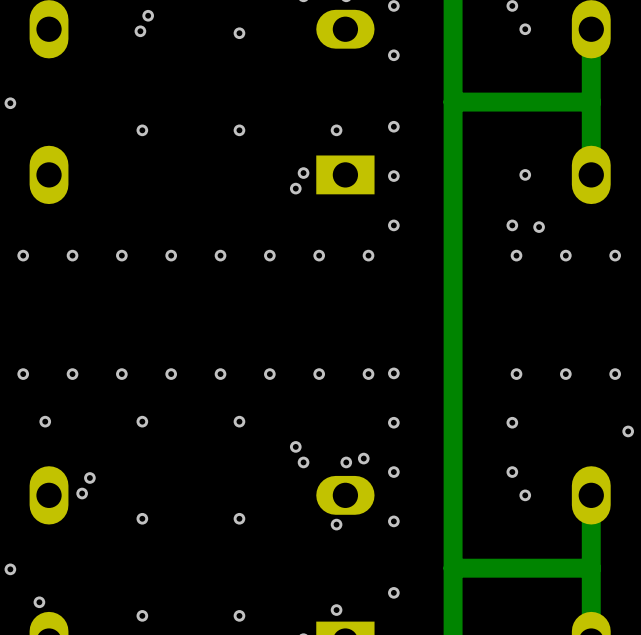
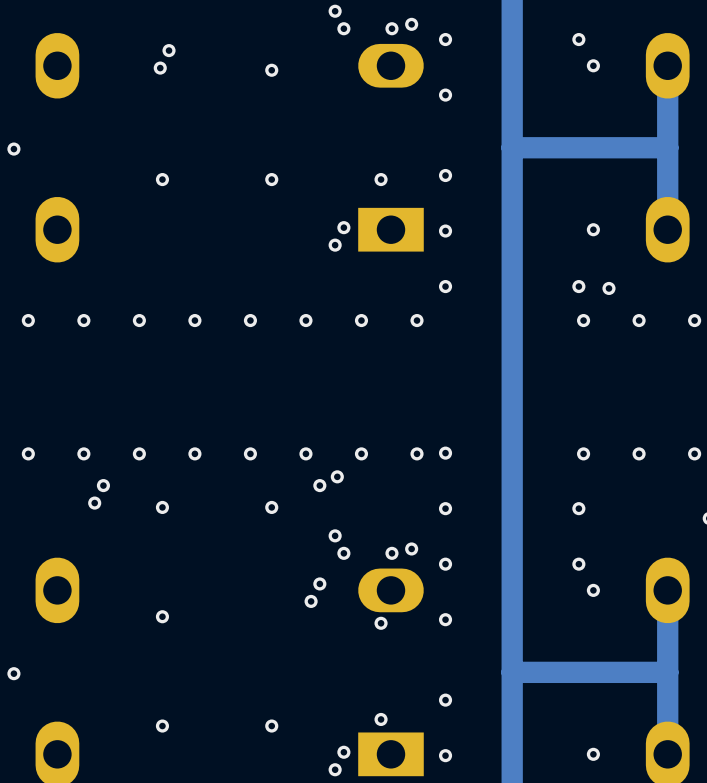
via: none -> (337, 476)
via: none -> (103, 485)
via: none -> (319, 485)
via: none -> (94, 503)
via: (45, 421) -> none
via: (89, 477) -> none
via: none -> (319, 583)
via: (82, 493) -> none
via: none -> (311, 601)
via: (239, 518) -> none
via: (39, 602) -> none

